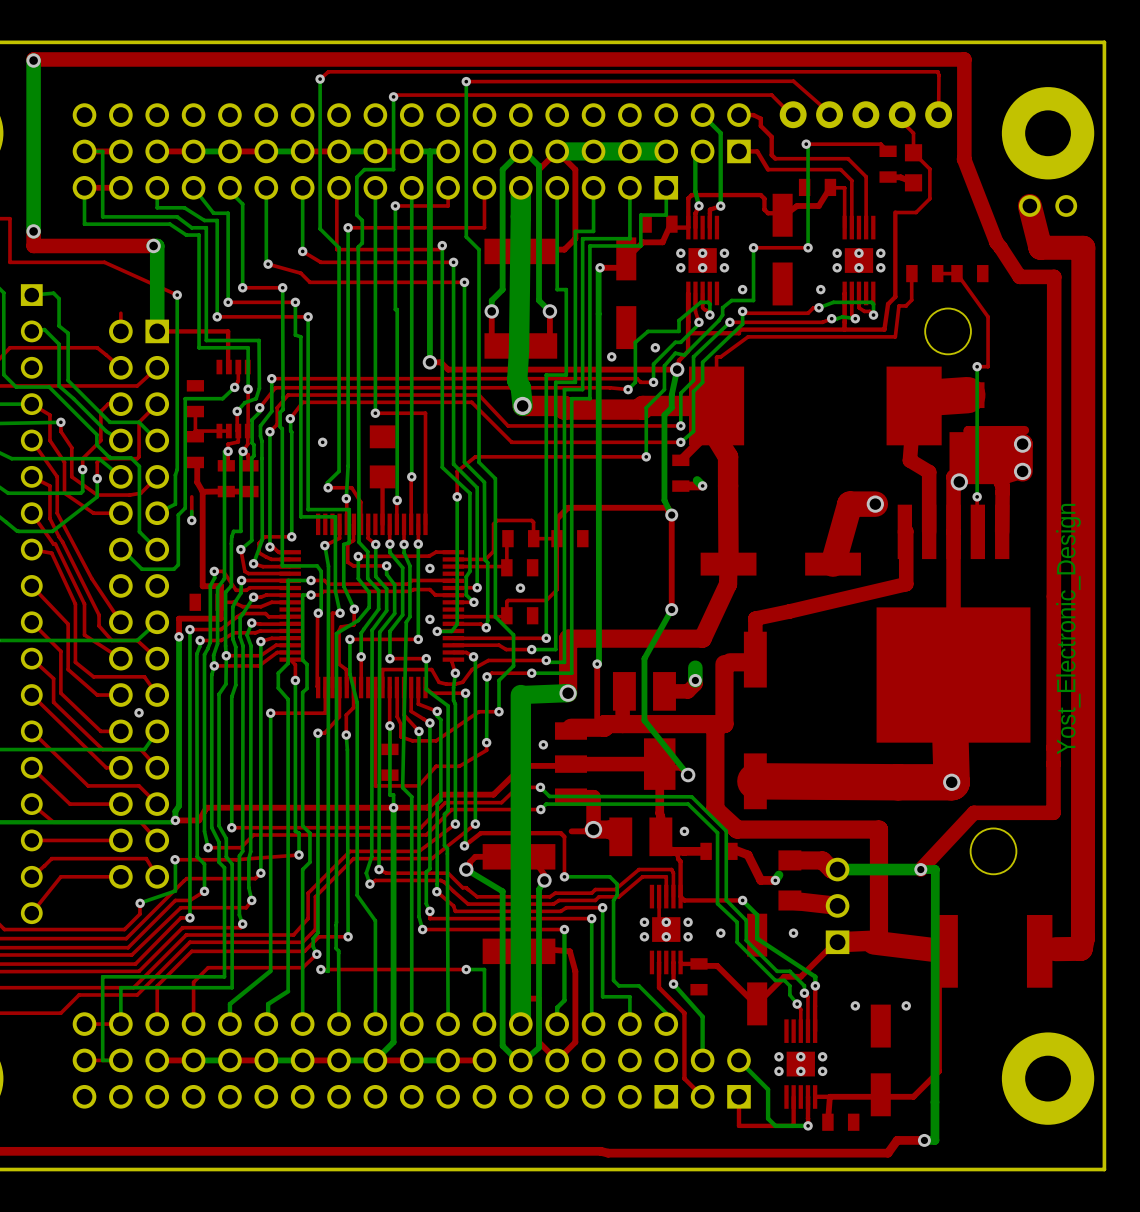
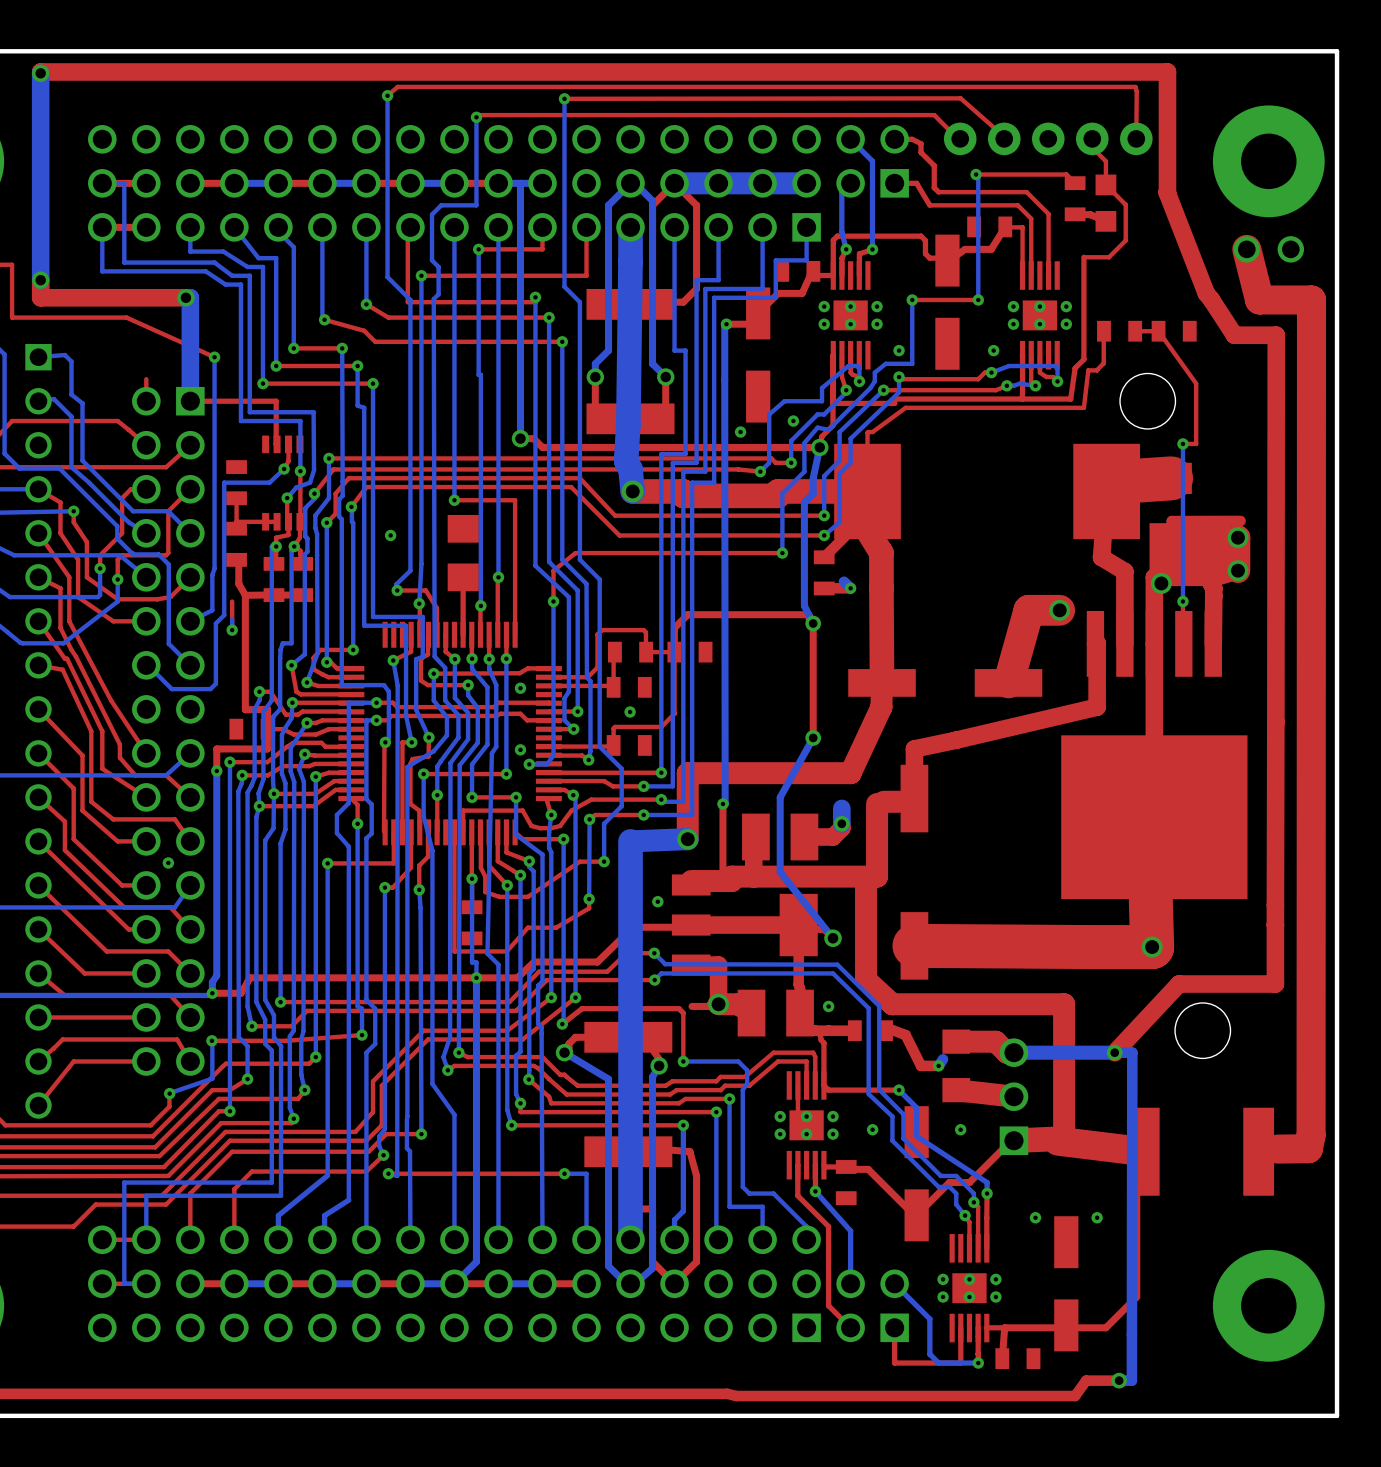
text: Yost_Electronic_Design (1068, 629) -> none

